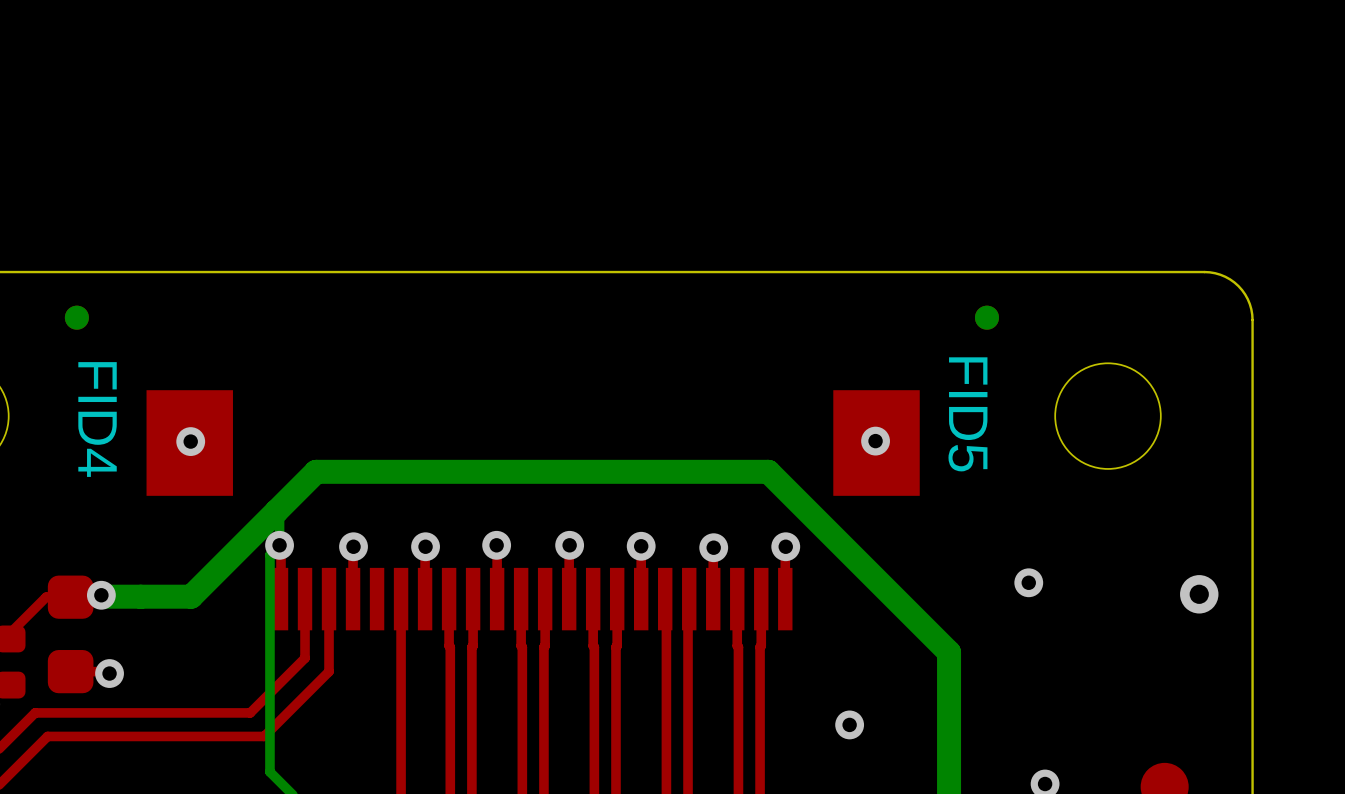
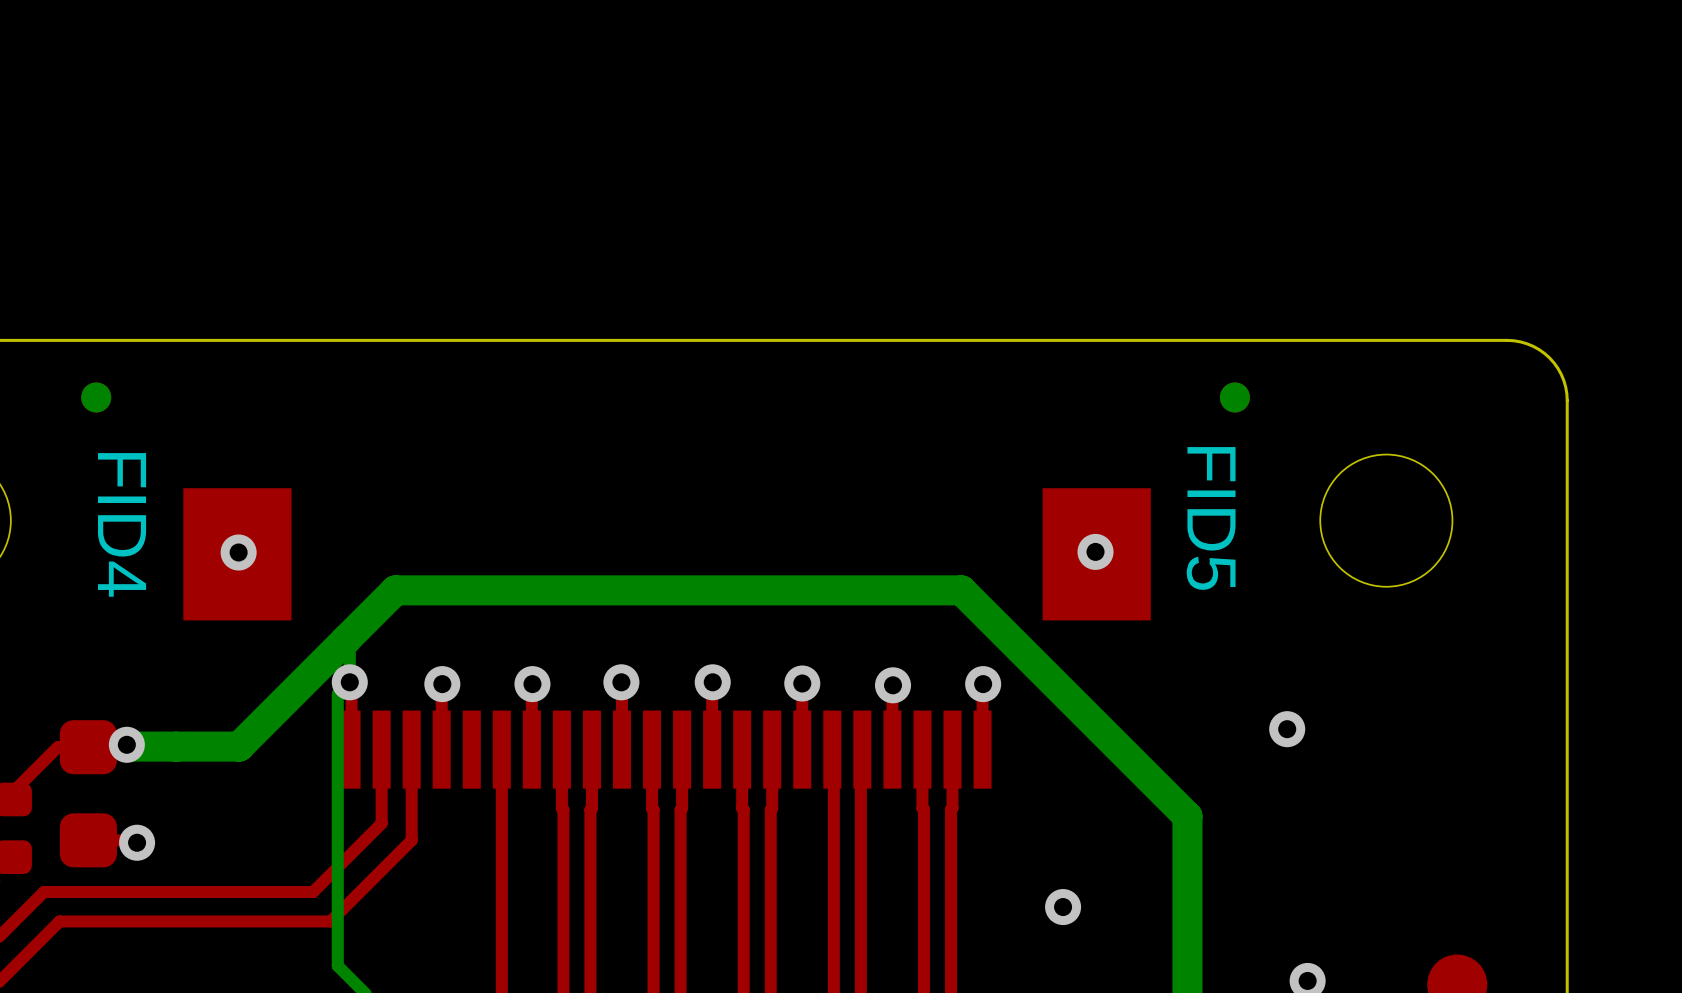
via: (1199, 594) -> none

